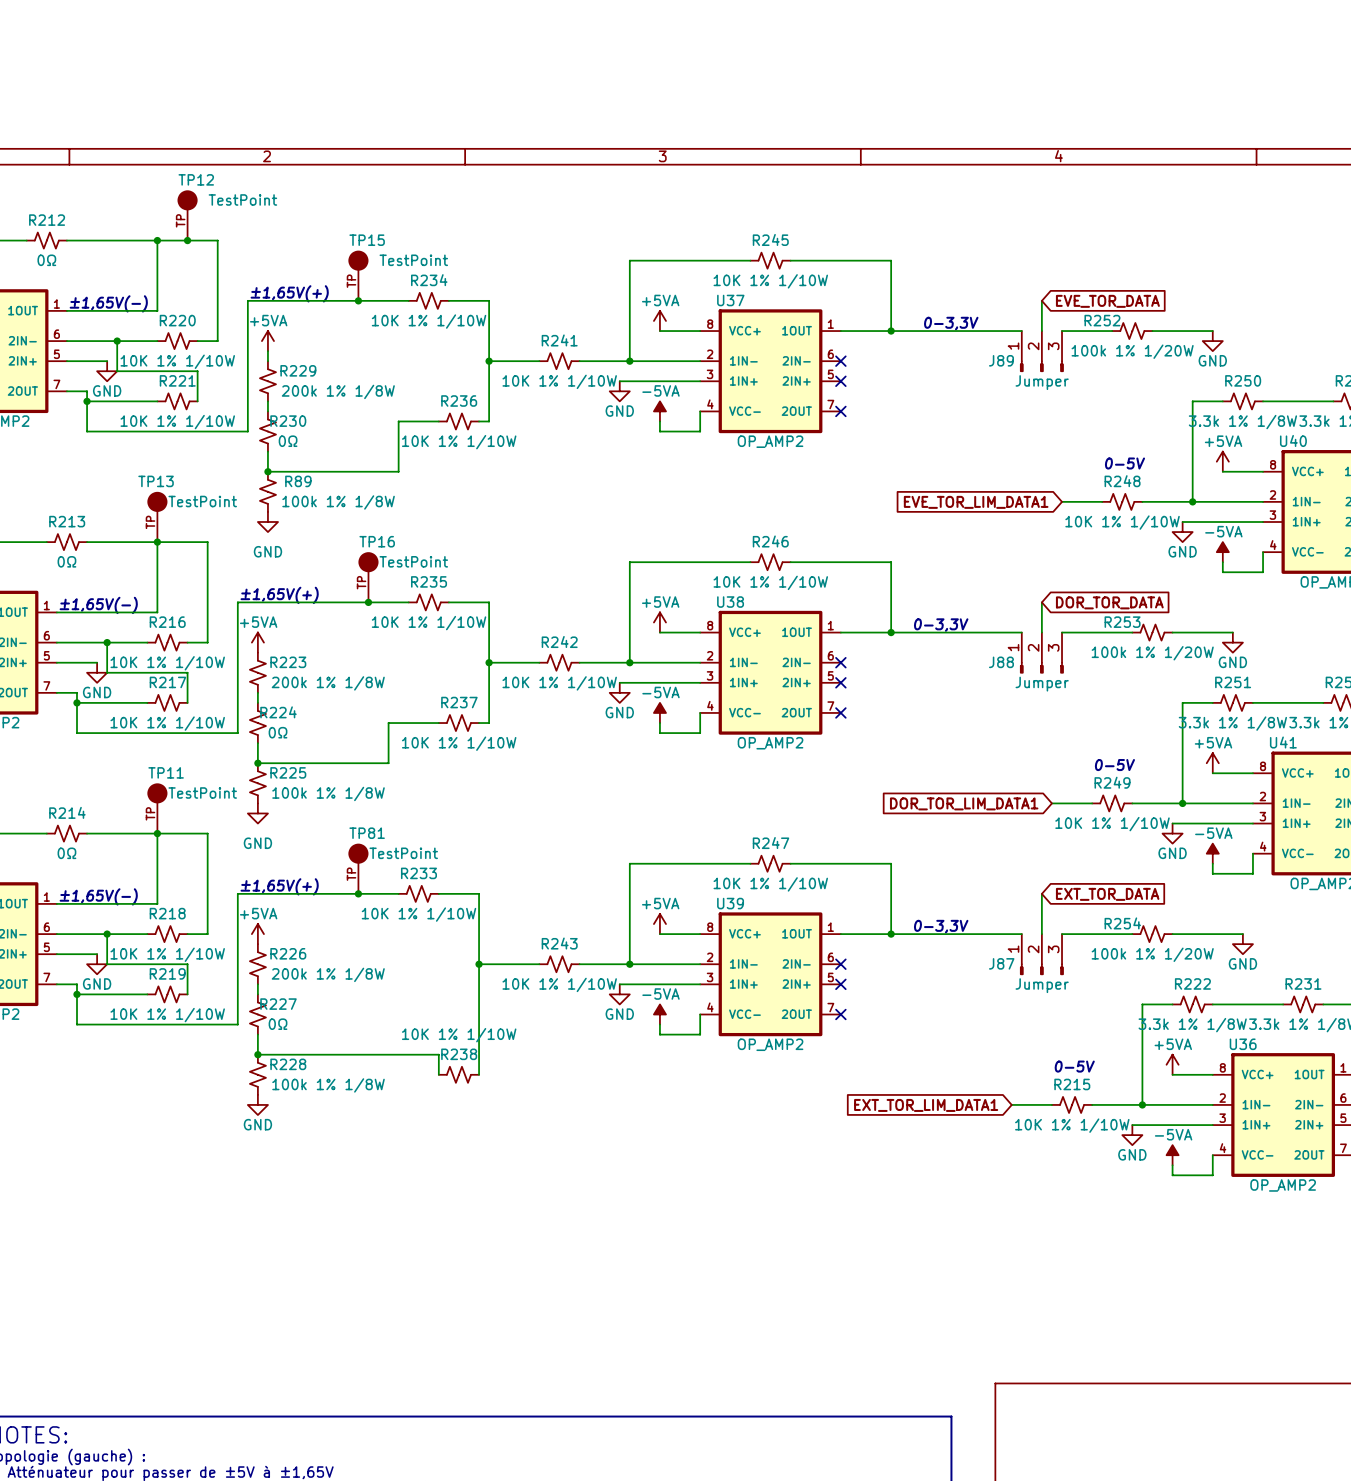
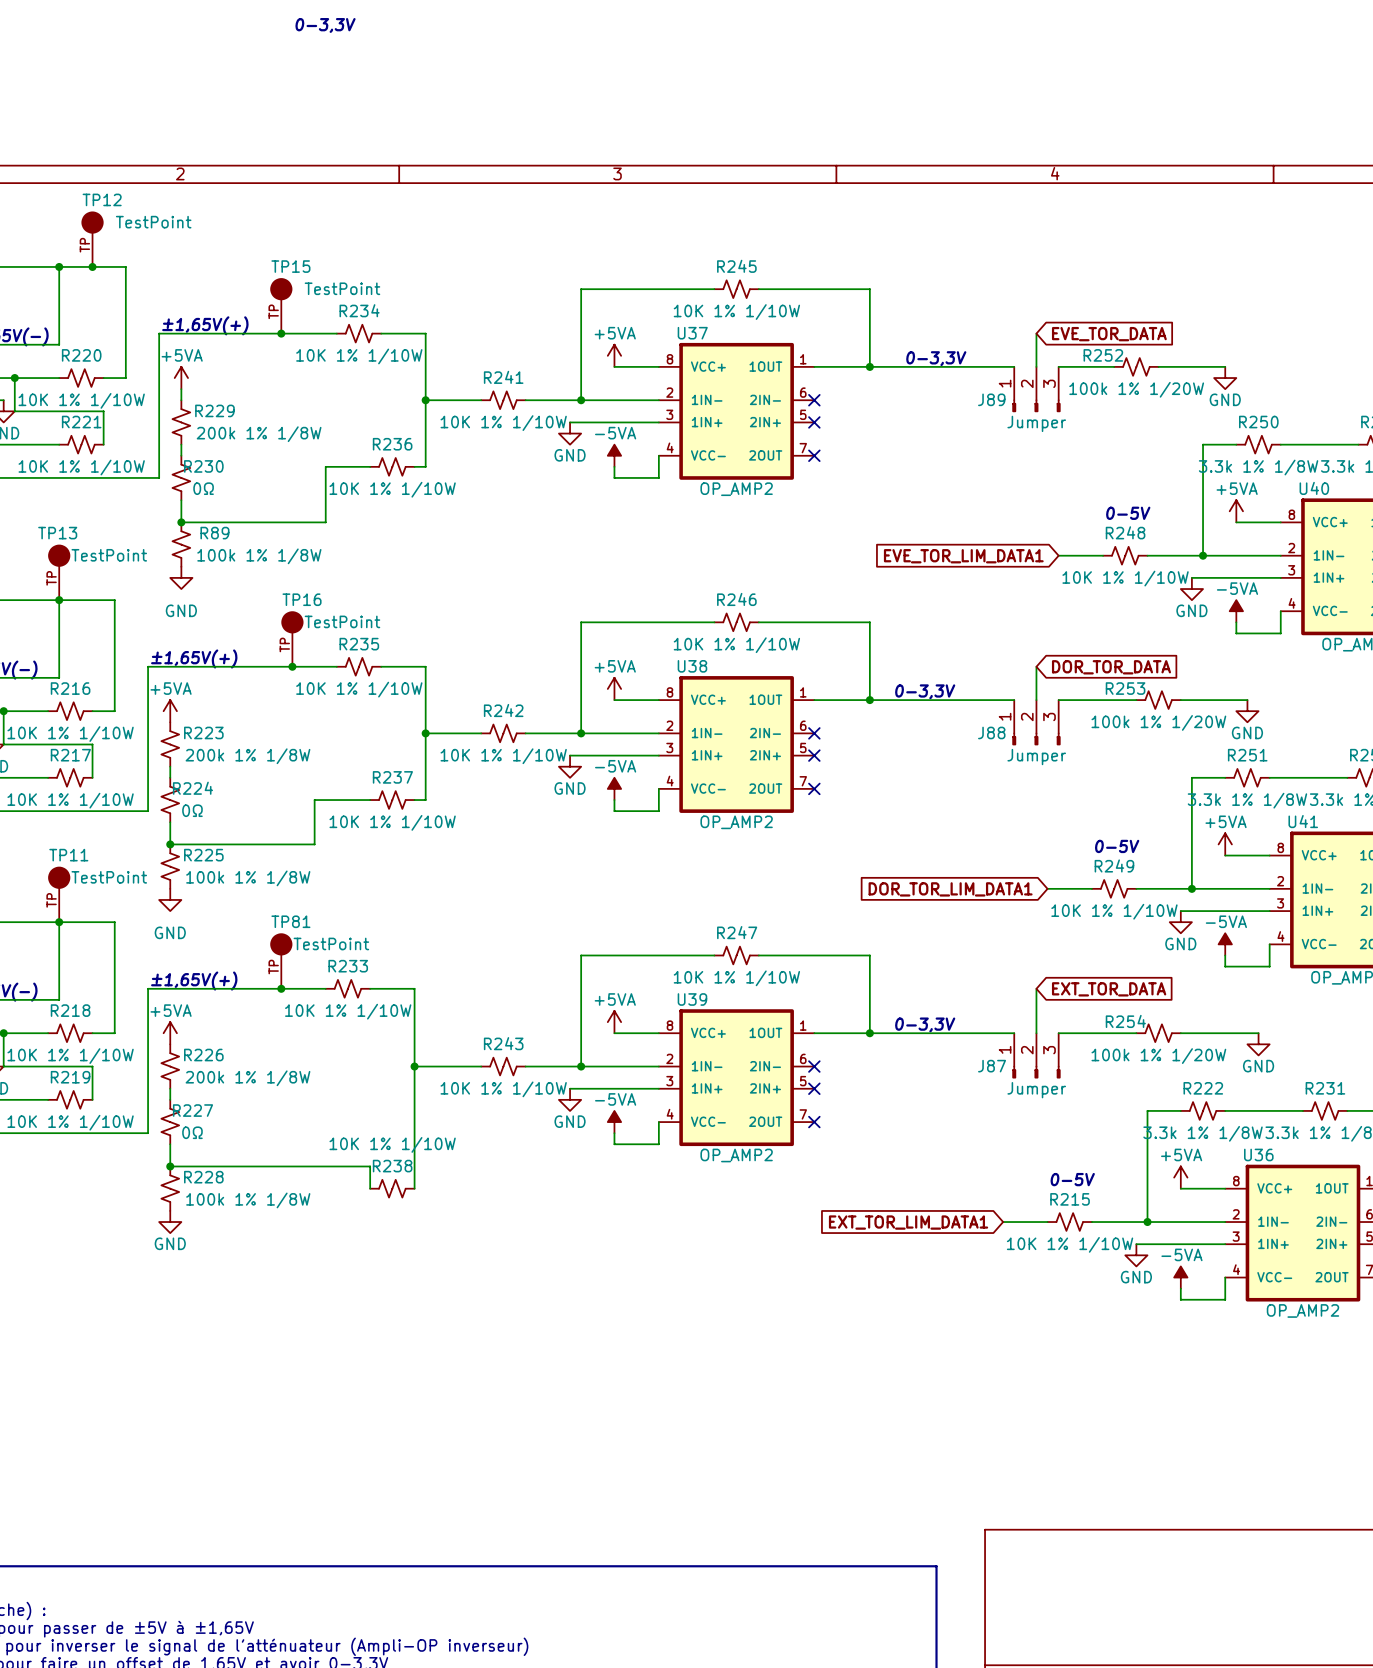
text: none -> 0-3,3V (325, 25)

